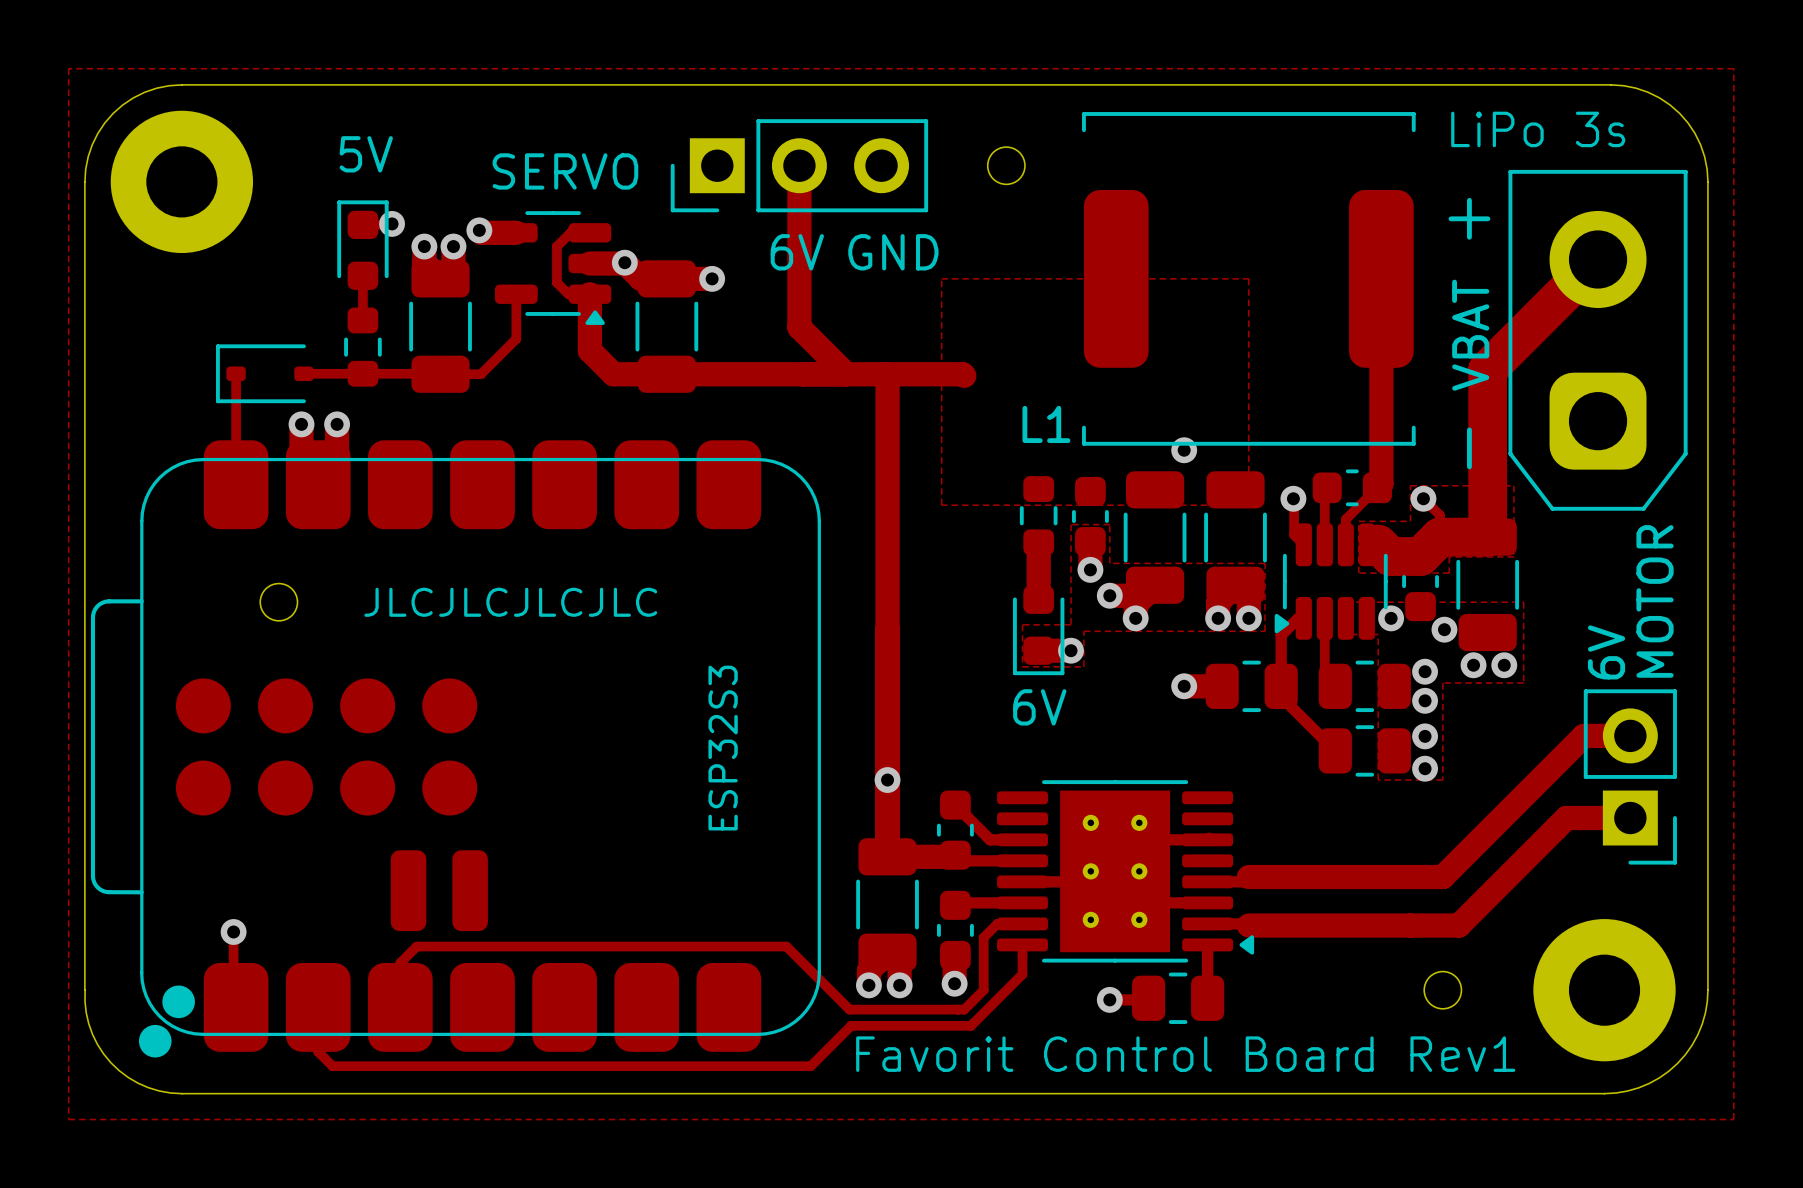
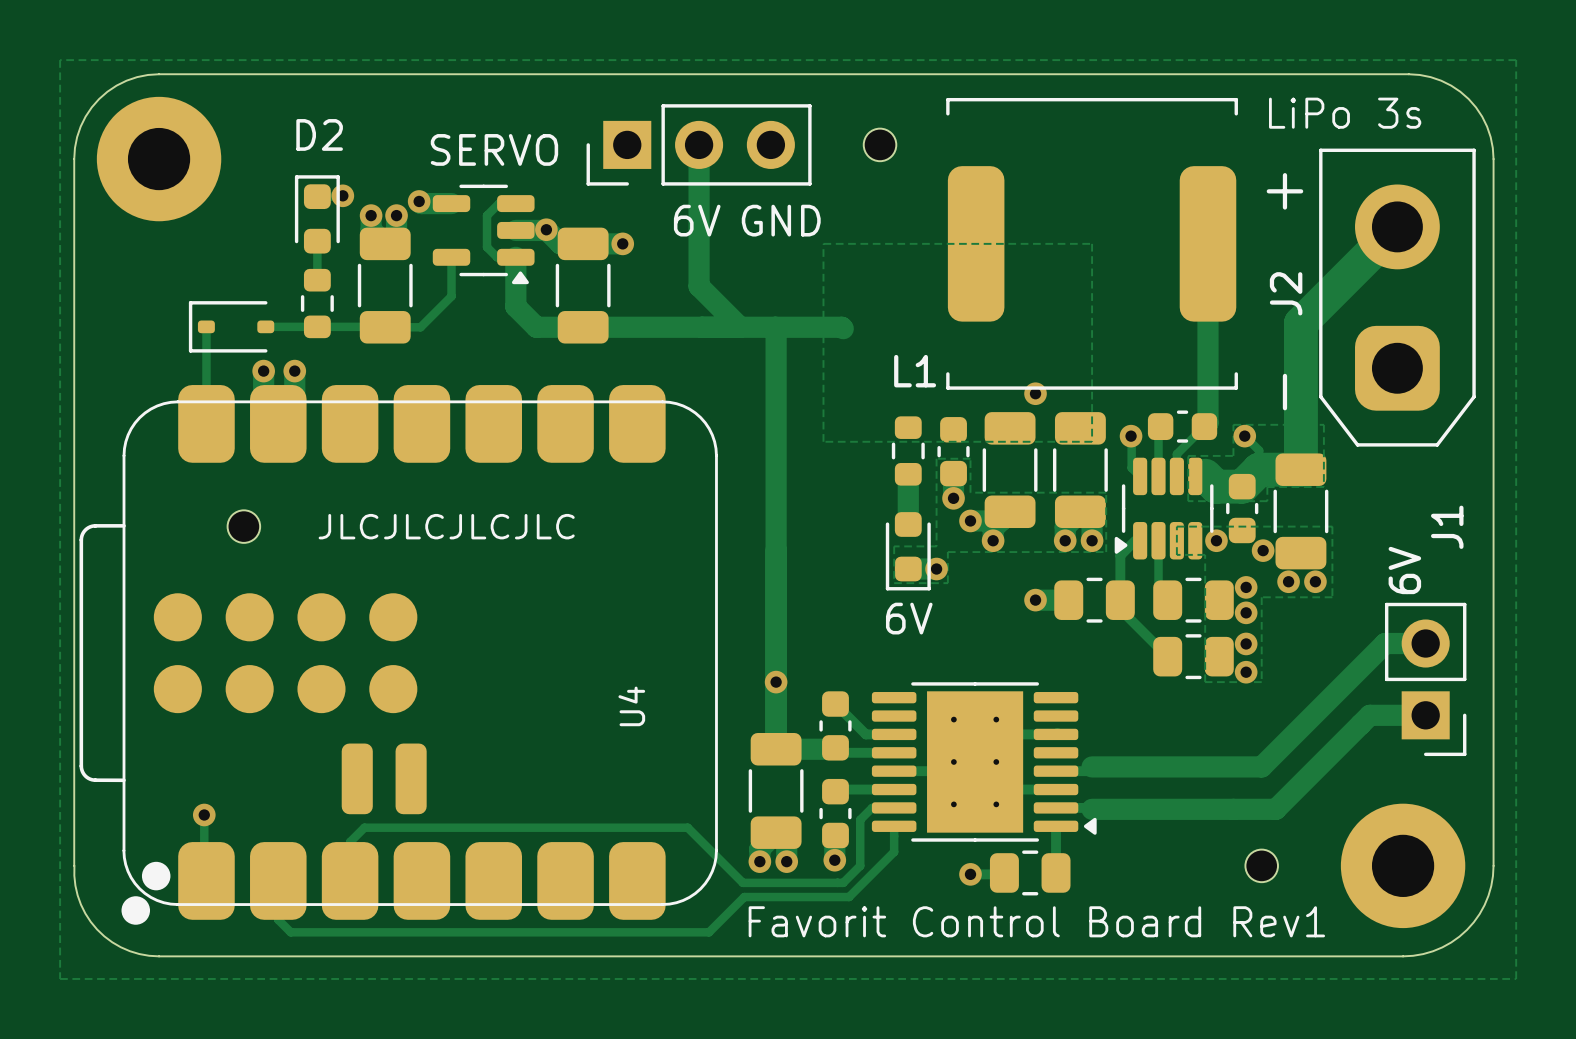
5V name: 5V (366, 154) -> D2 (319, 134)
VBAT name: VBAT (1470, 335) -> J2 (1286, 293)
MOTOR name: MOTOR (1655, 601) -> J1 (1447, 527)
ESP32S3 name: ESP32S3 (723, 748) -> U4 (631, 706)

